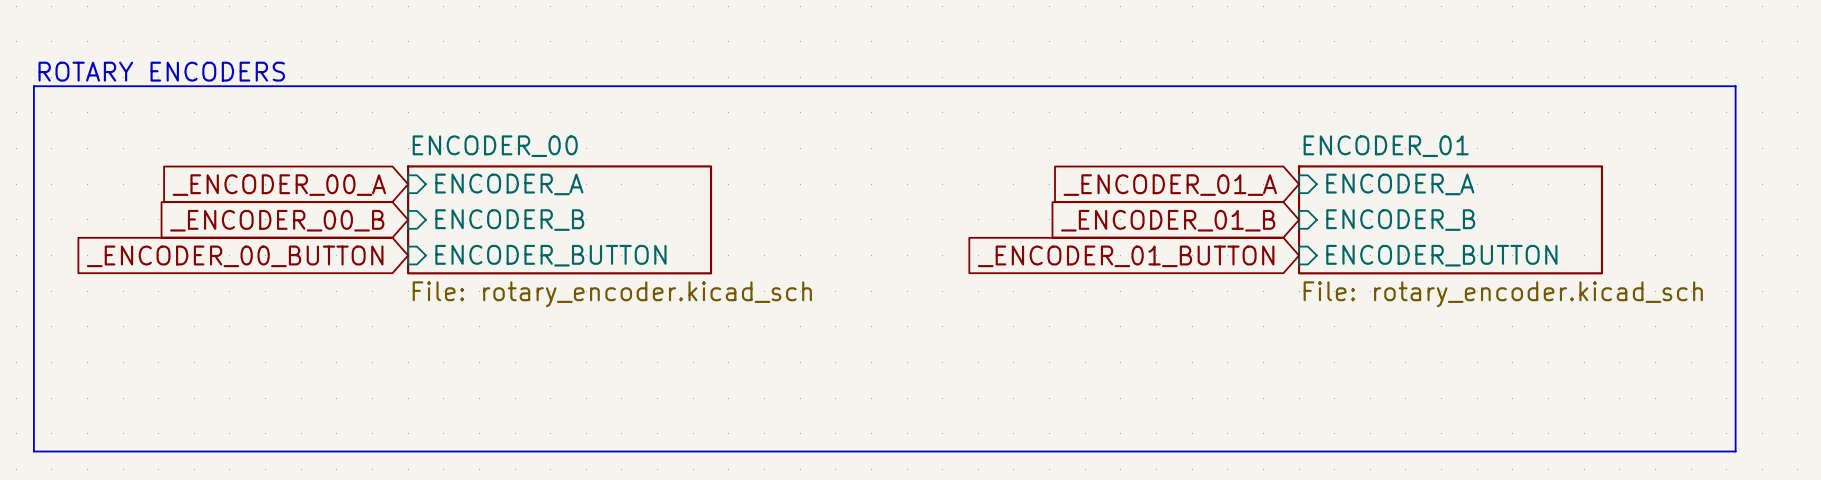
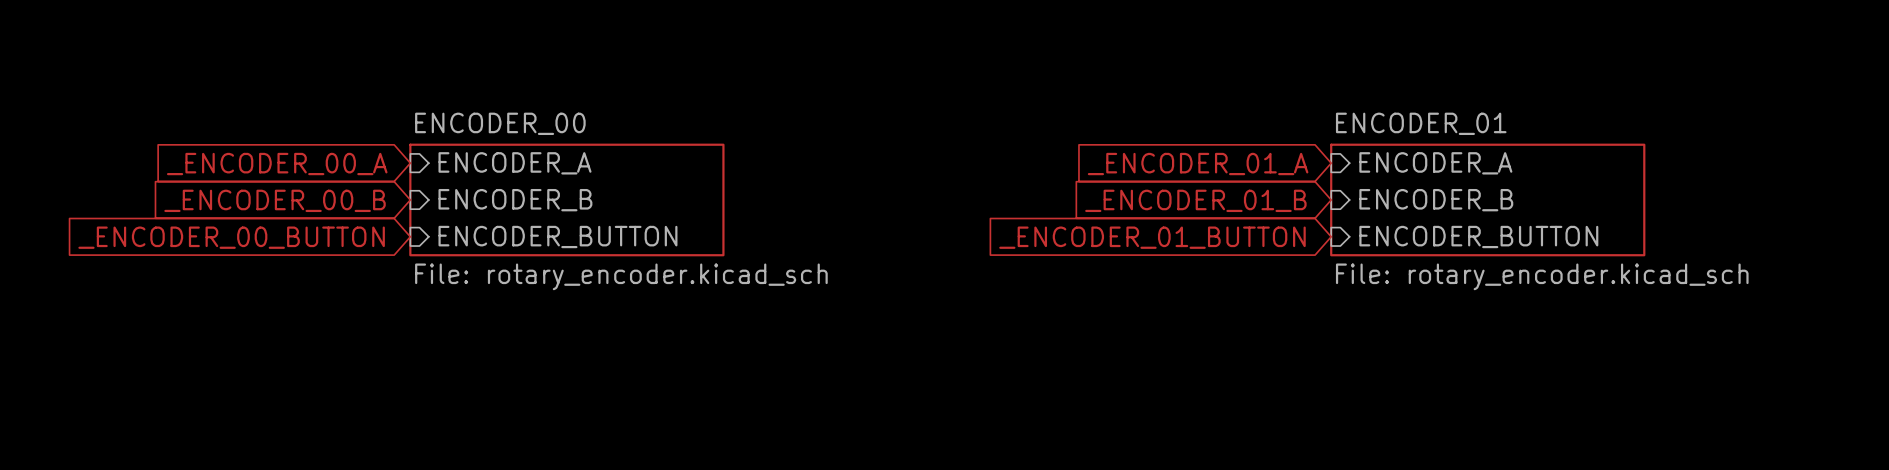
text: ROTARY ENCODERS (161, 71) -> none
line: (33, 86) (1735, 86) (1735, 451) (33, 451) (33, 86) -> none

